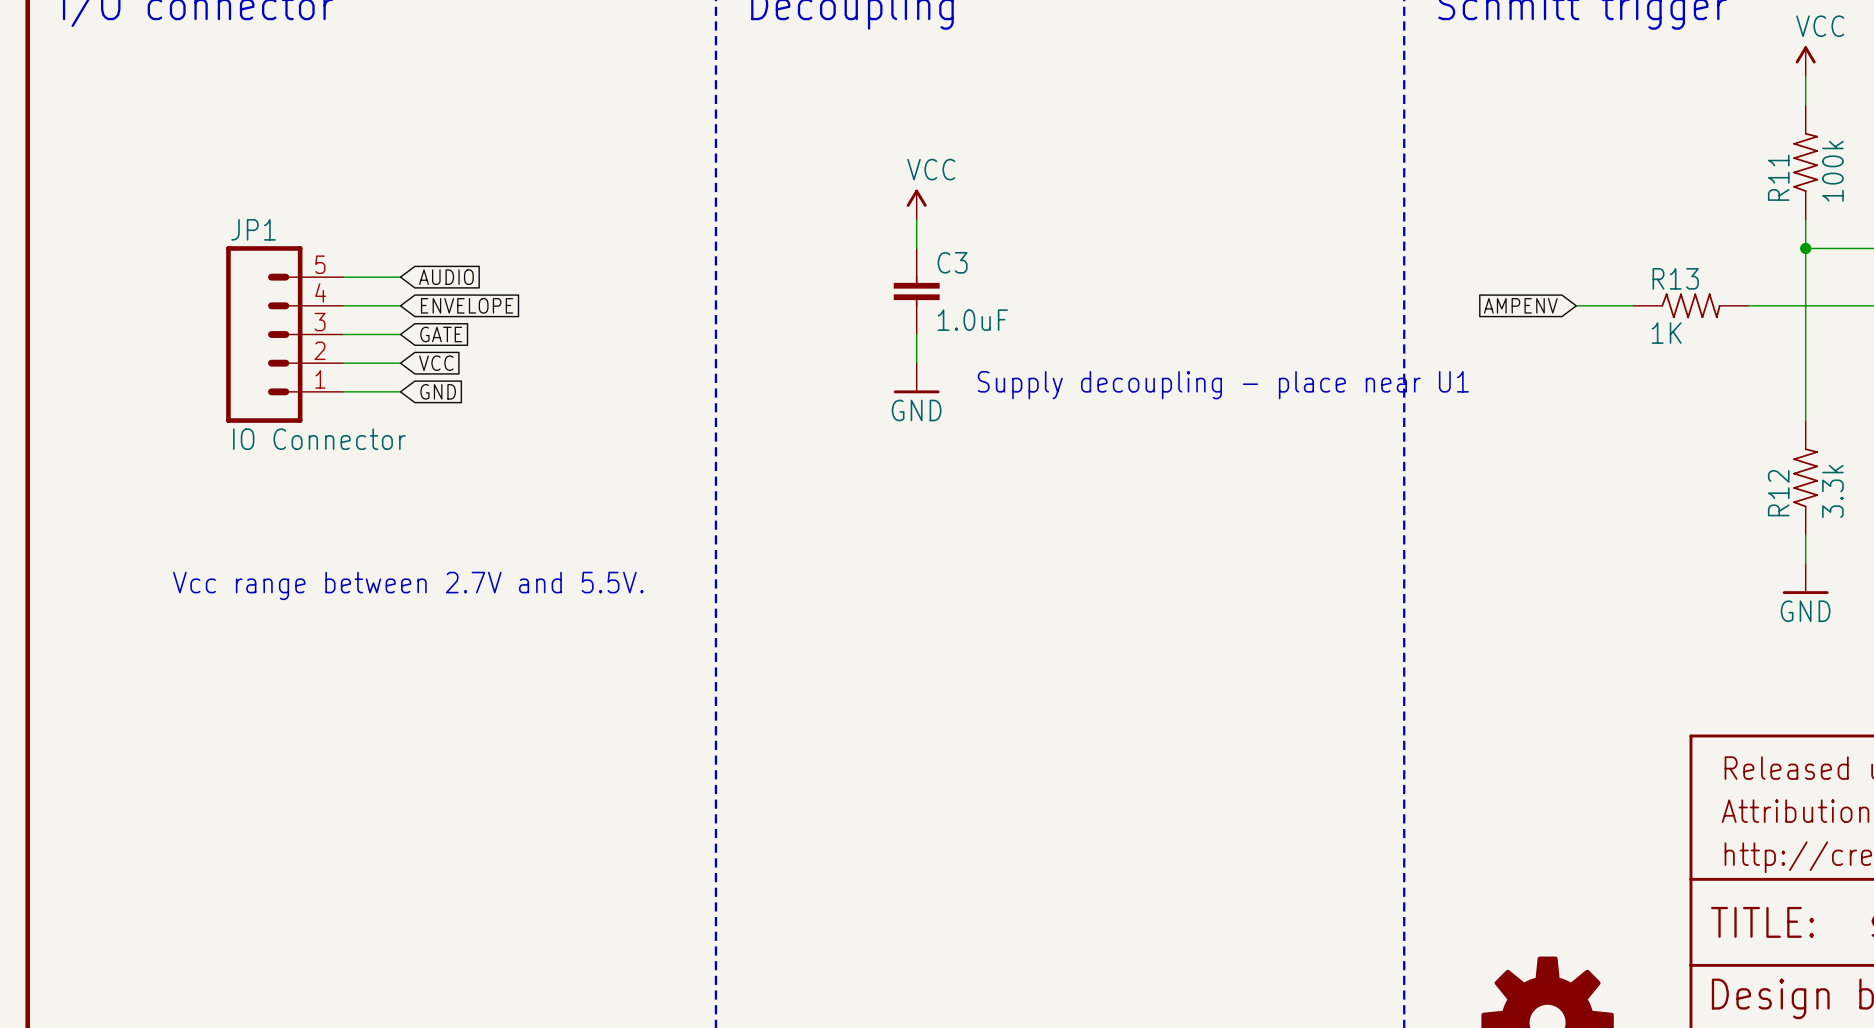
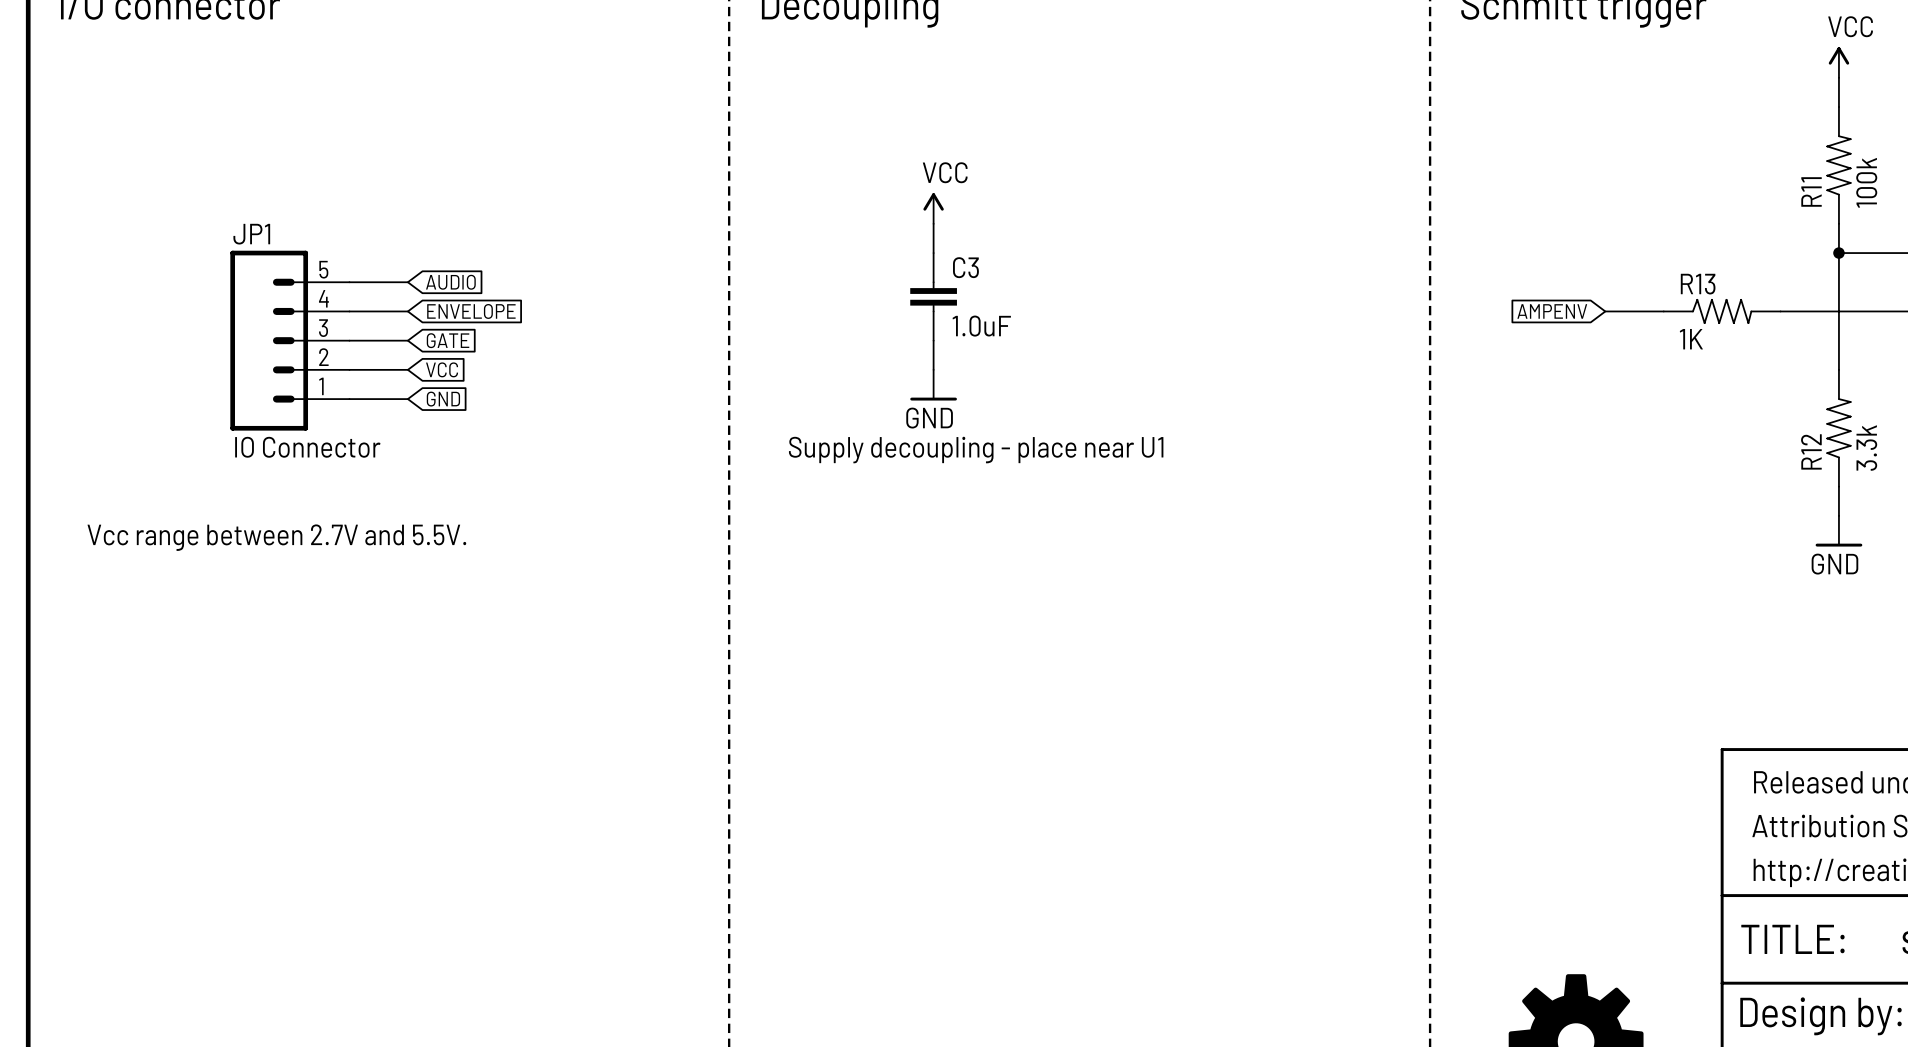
text position: Supply decoupling - place near U1 (1223, 385) -> Supply decoupling - place near U1 (976, 450)
R12 position: (1805, 477) -> (1838, 428)
wire: (1805, 535) (1805, 563) -> (1838, 486) (1838, 515)
power symbol position: GND (1805, 578) -> GND (1838, 531)
text position: Vcc range between 2.7V and 5.5V. (408, 585) -> Vcc range between 2.7V and 5.5V. (276, 537)

